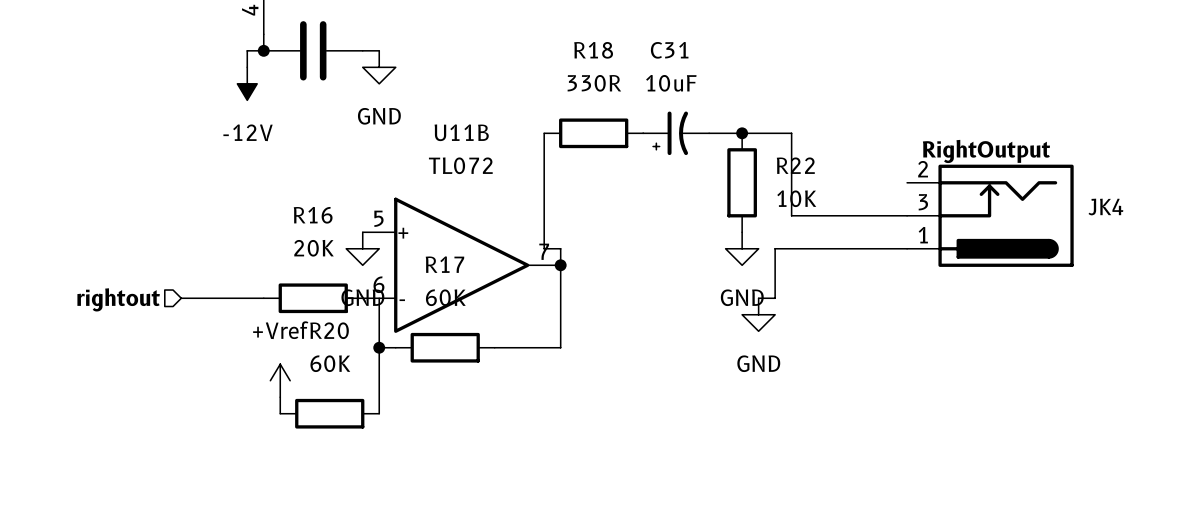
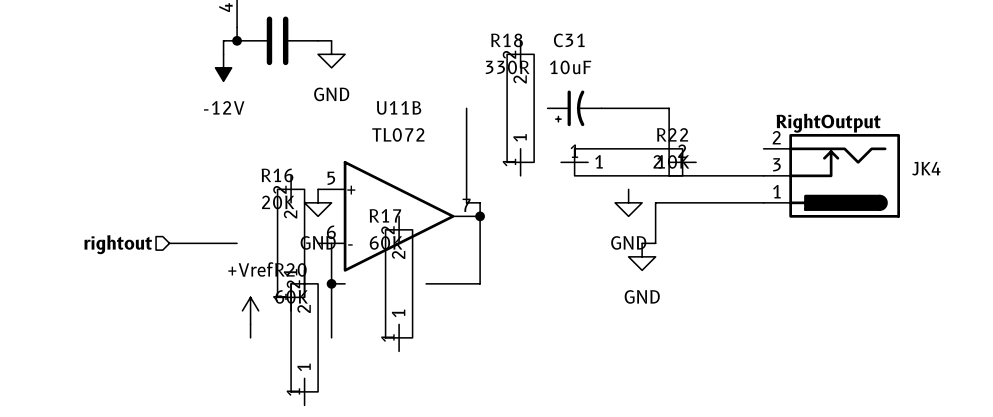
R18 symbol: [544, 118, 644, 149] -> [507, 40, 535, 176]
R22 symbol: [727, 133, 757, 233] -> [561, 148, 697, 176]
junction: (742, 133) -> none
R16 symbol: [263, 283, 363, 314] -> [277, 175, 305, 311]
R17 symbol: [395, 332, 495, 363] -> [385, 216, 413, 352]
R20 symbol: [280, 398, 380, 429] -> [291, 270, 319, 406]

